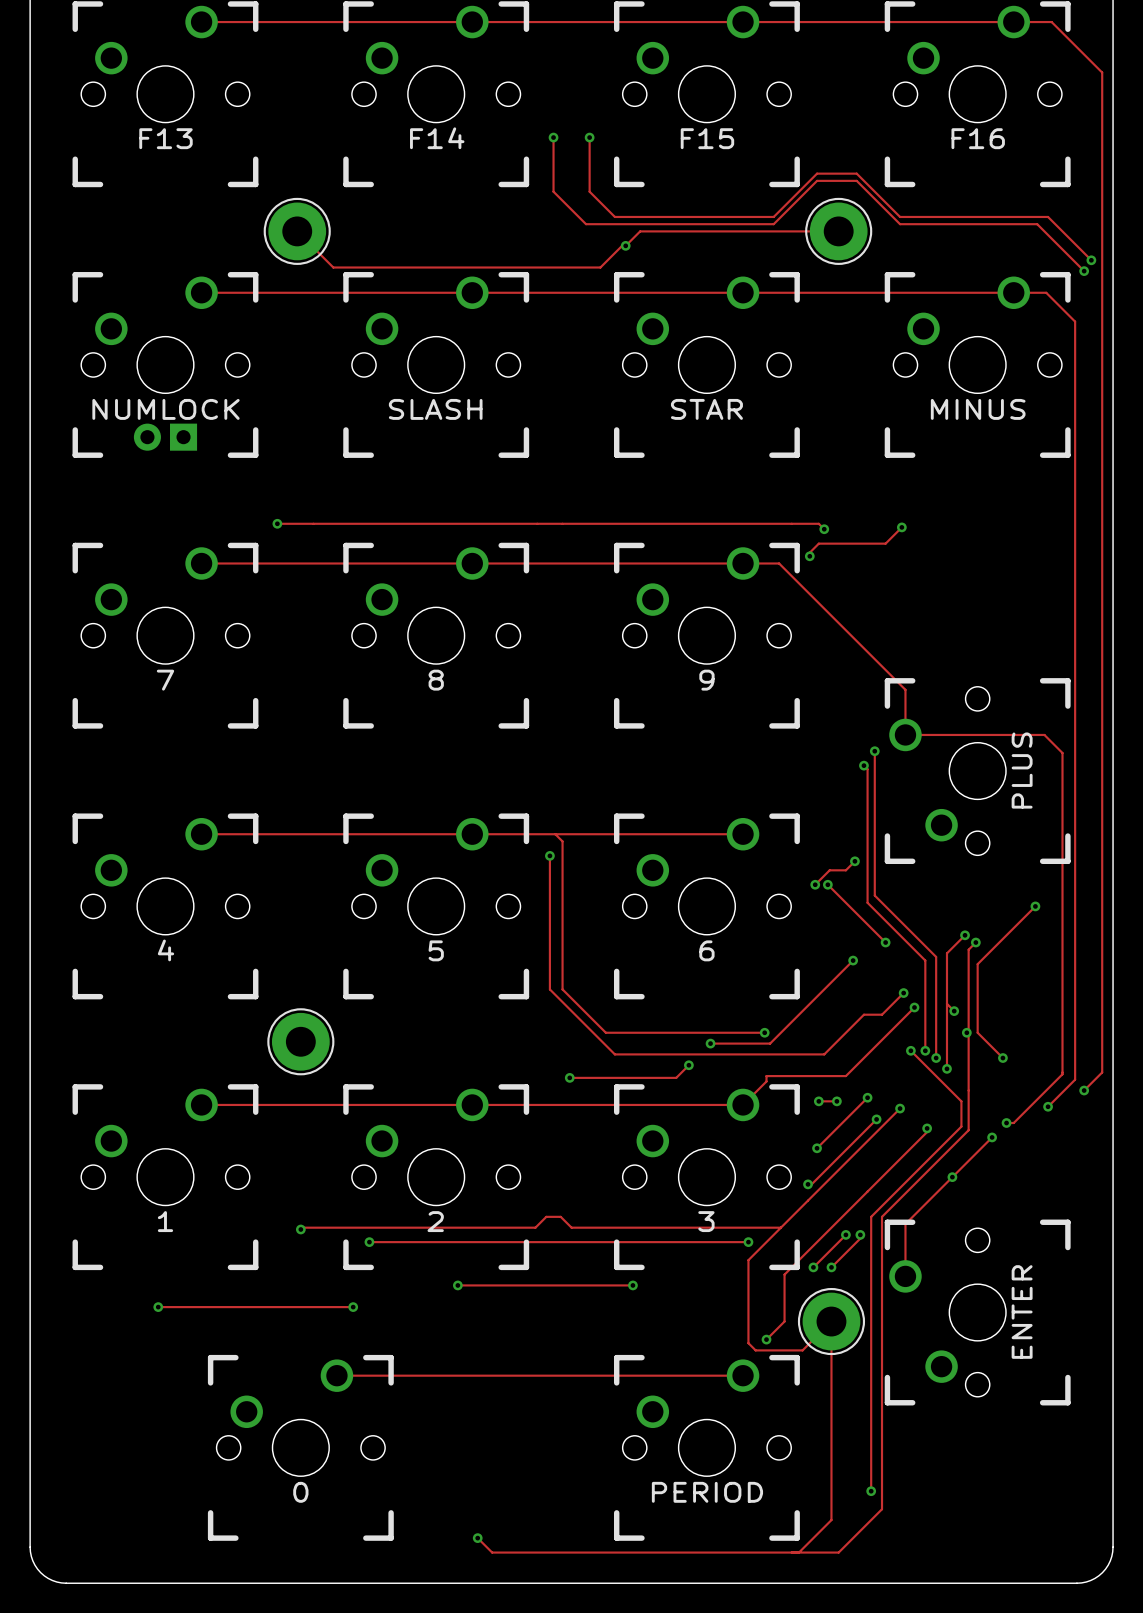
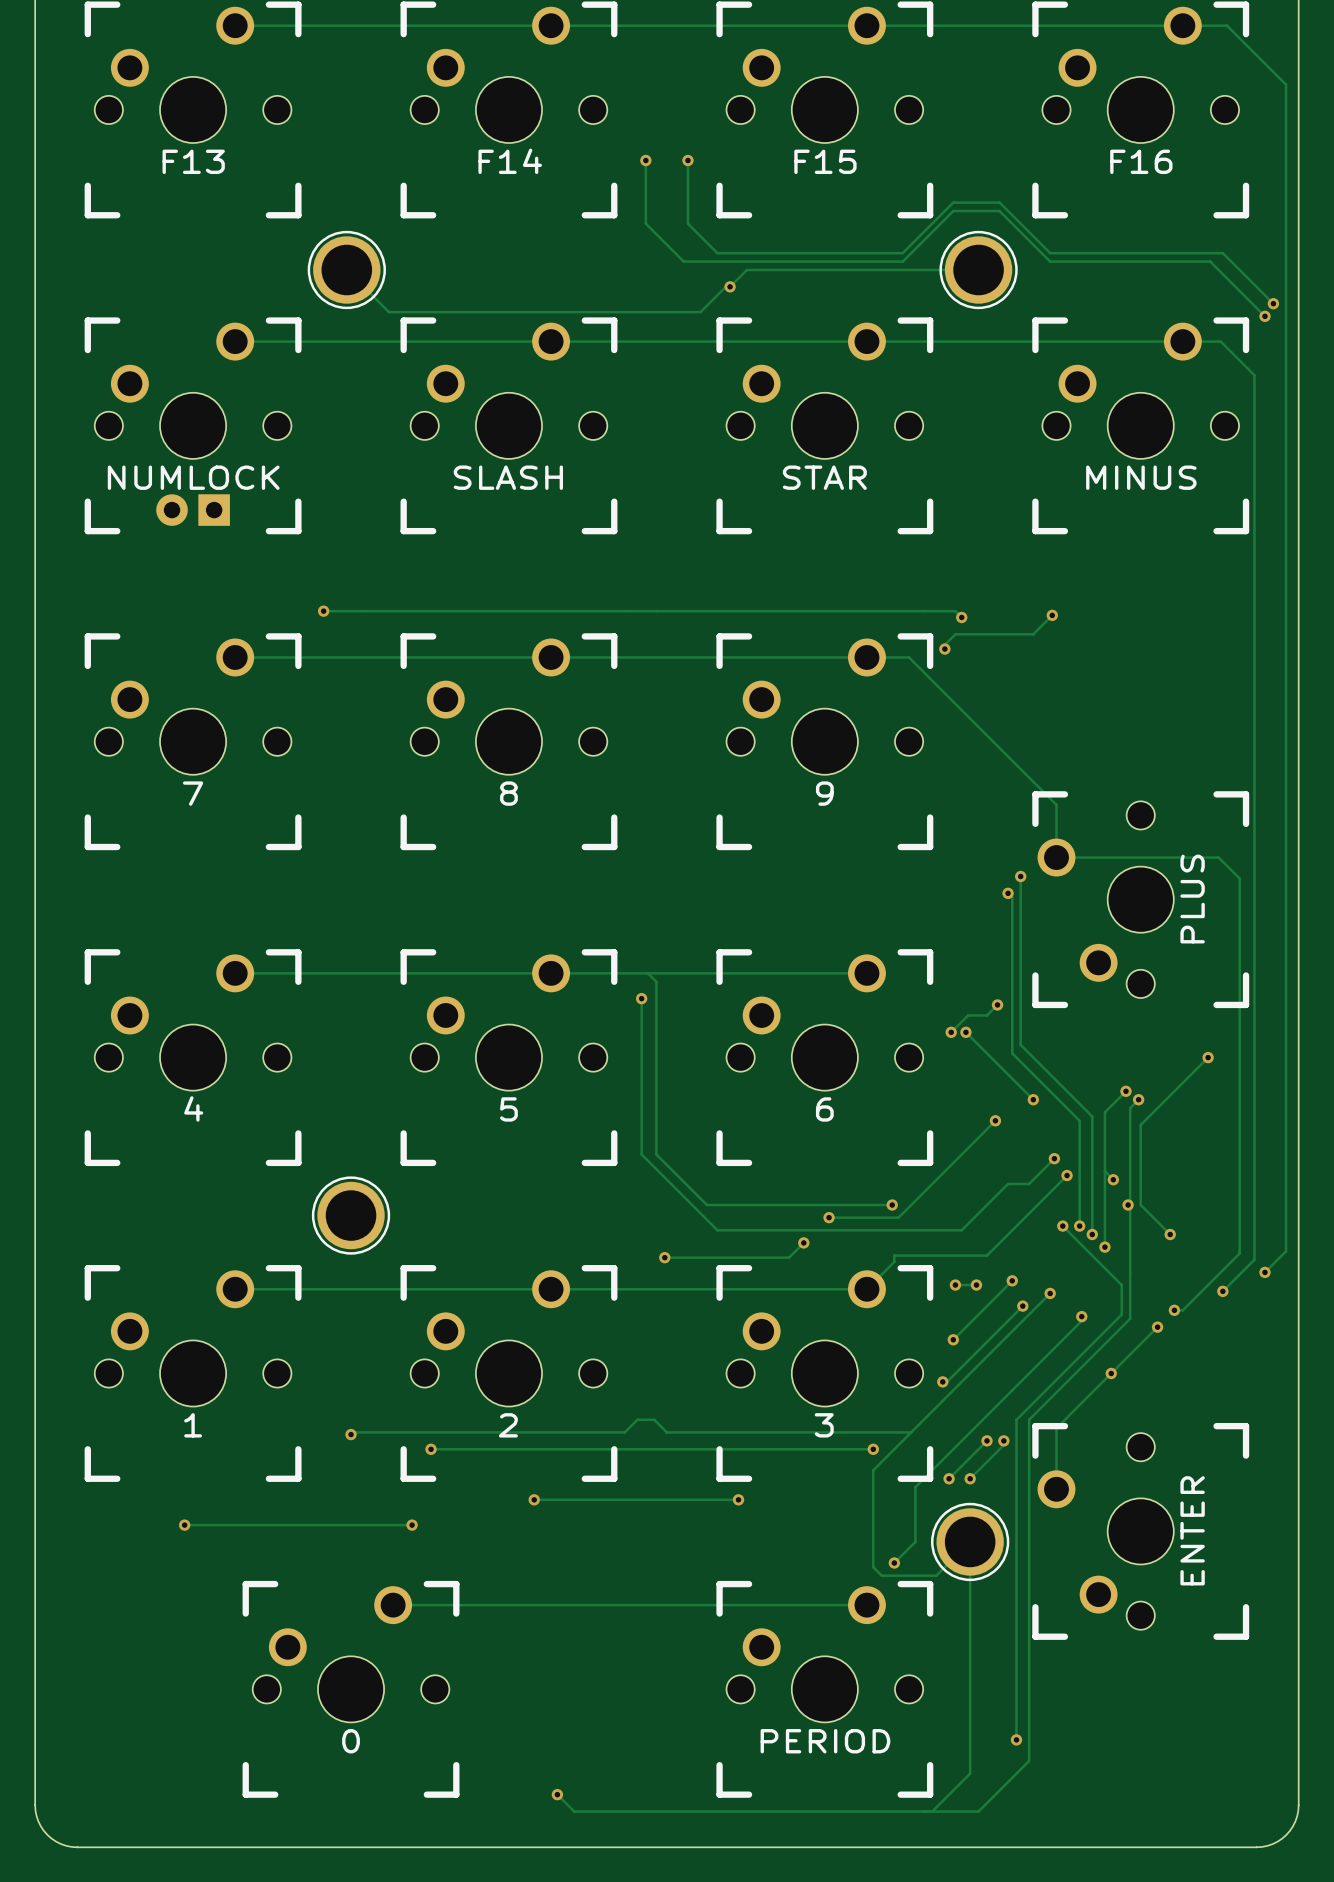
part footprint: [263, 197, 331, 265] -> [307, 230, 386, 310]
part footprint: [805, 197, 873, 265] -> [939, 230, 1018, 310]
part footprint: [267, 1008, 335, 1076] -> [311, 1176, 391, 1255]
part footprint: [797, 1287, 866, 1356] -> [931, 1502, 1010, 1582]

